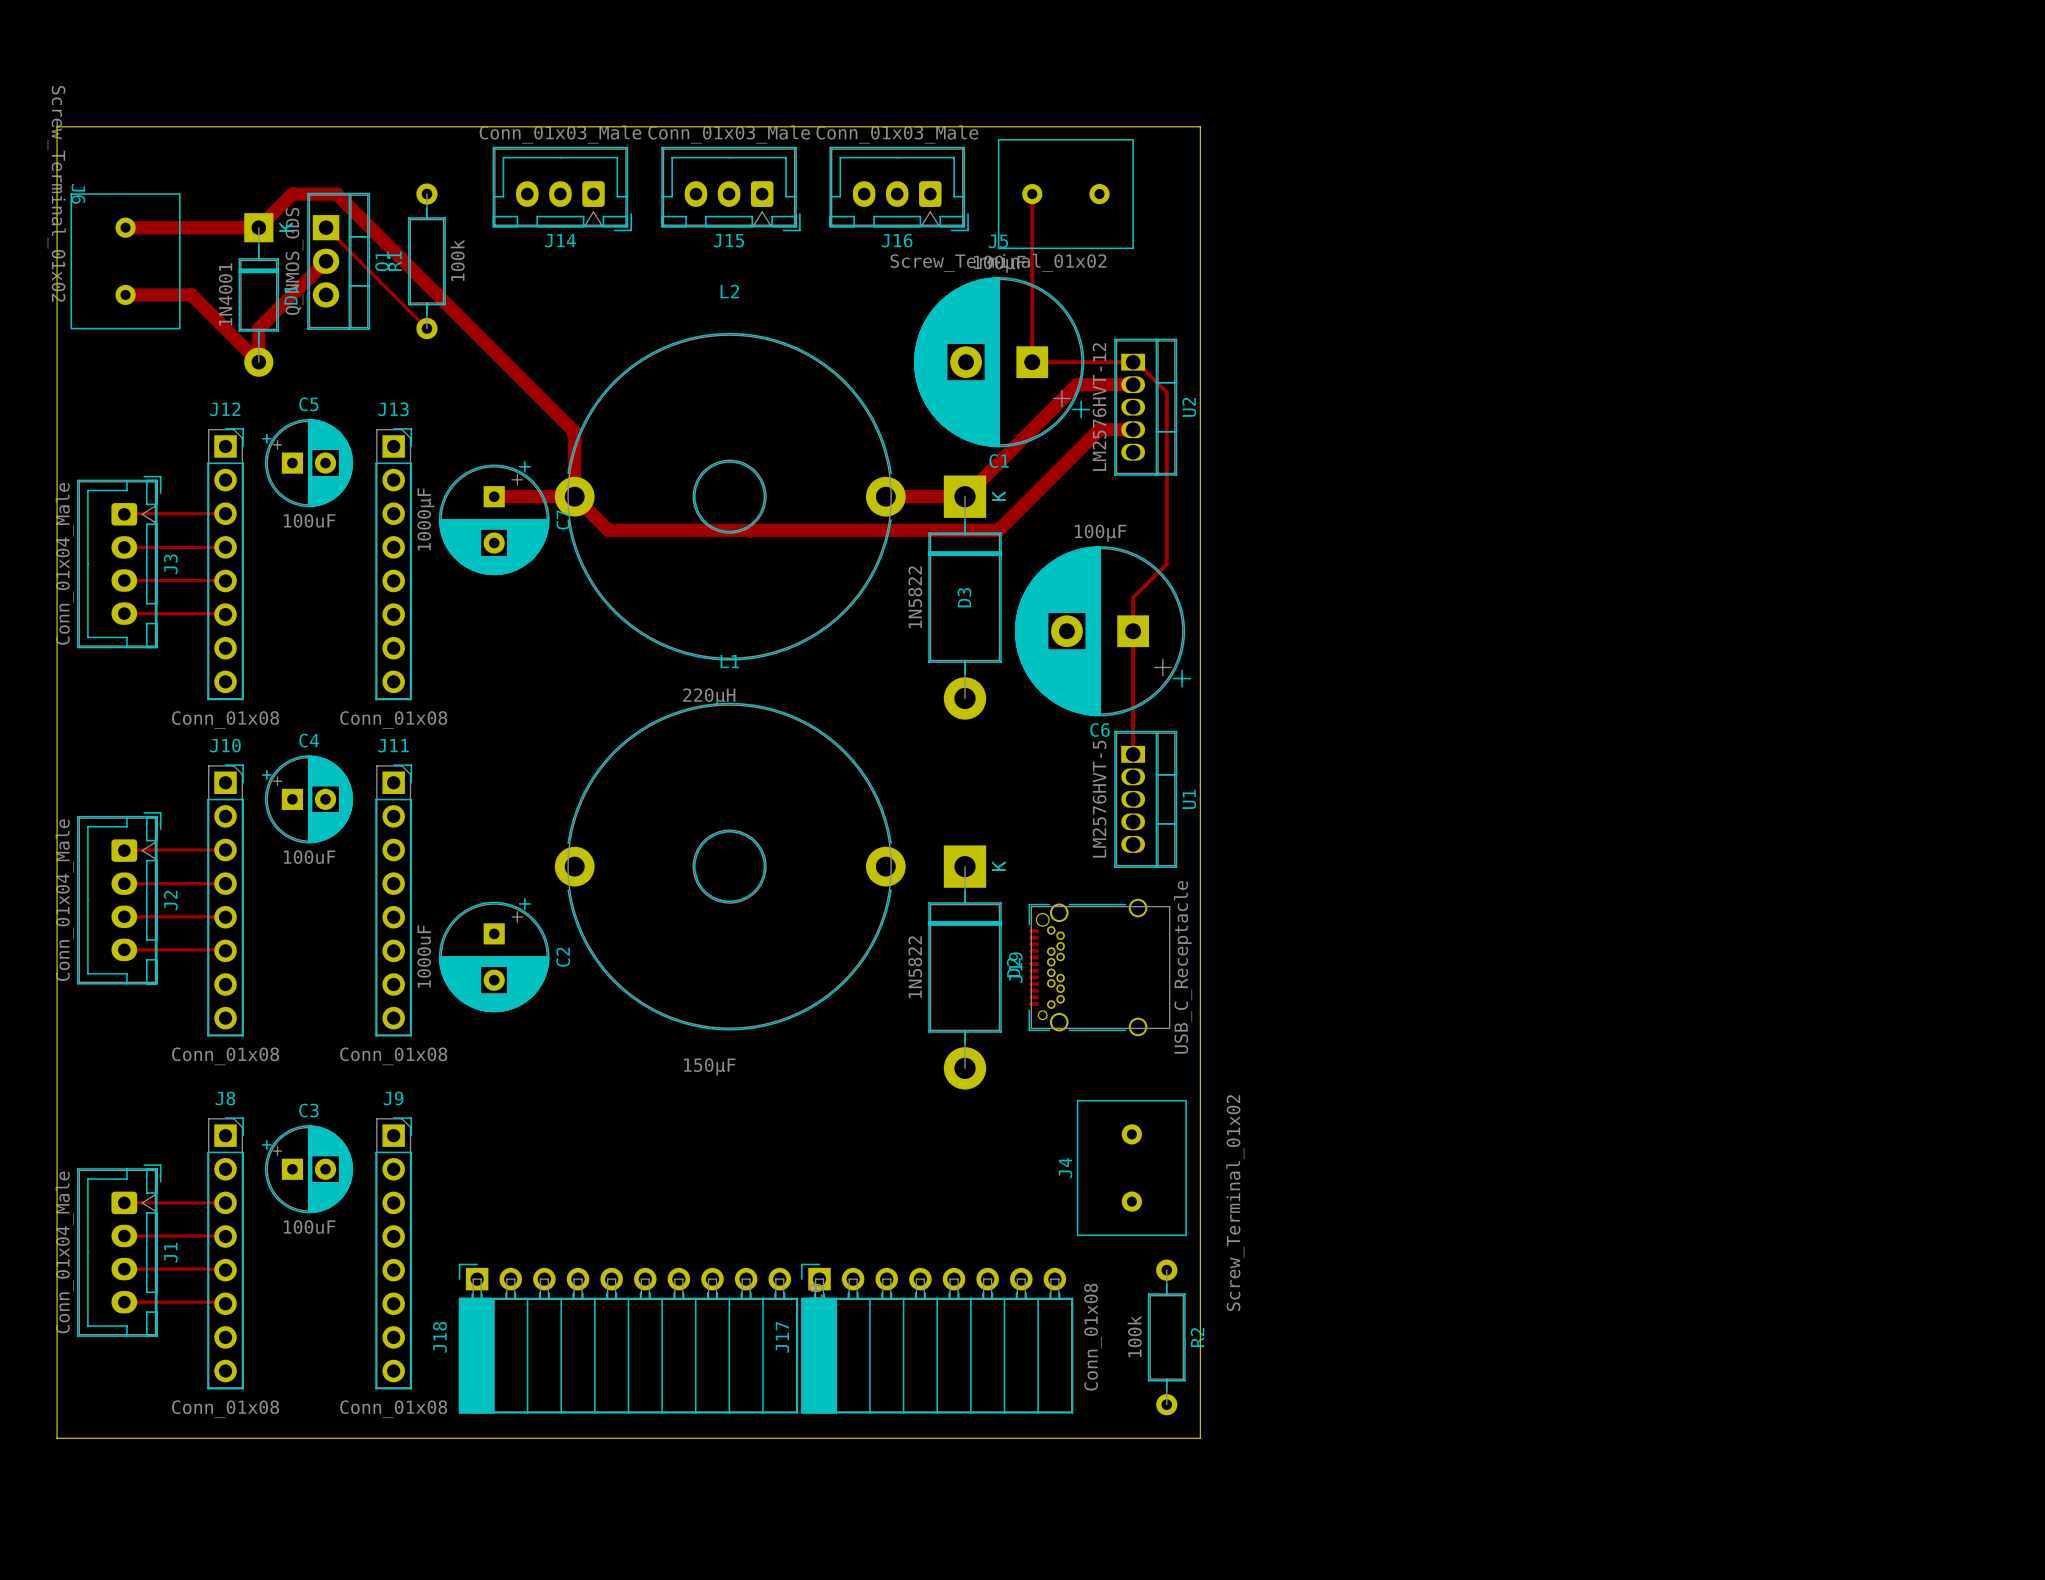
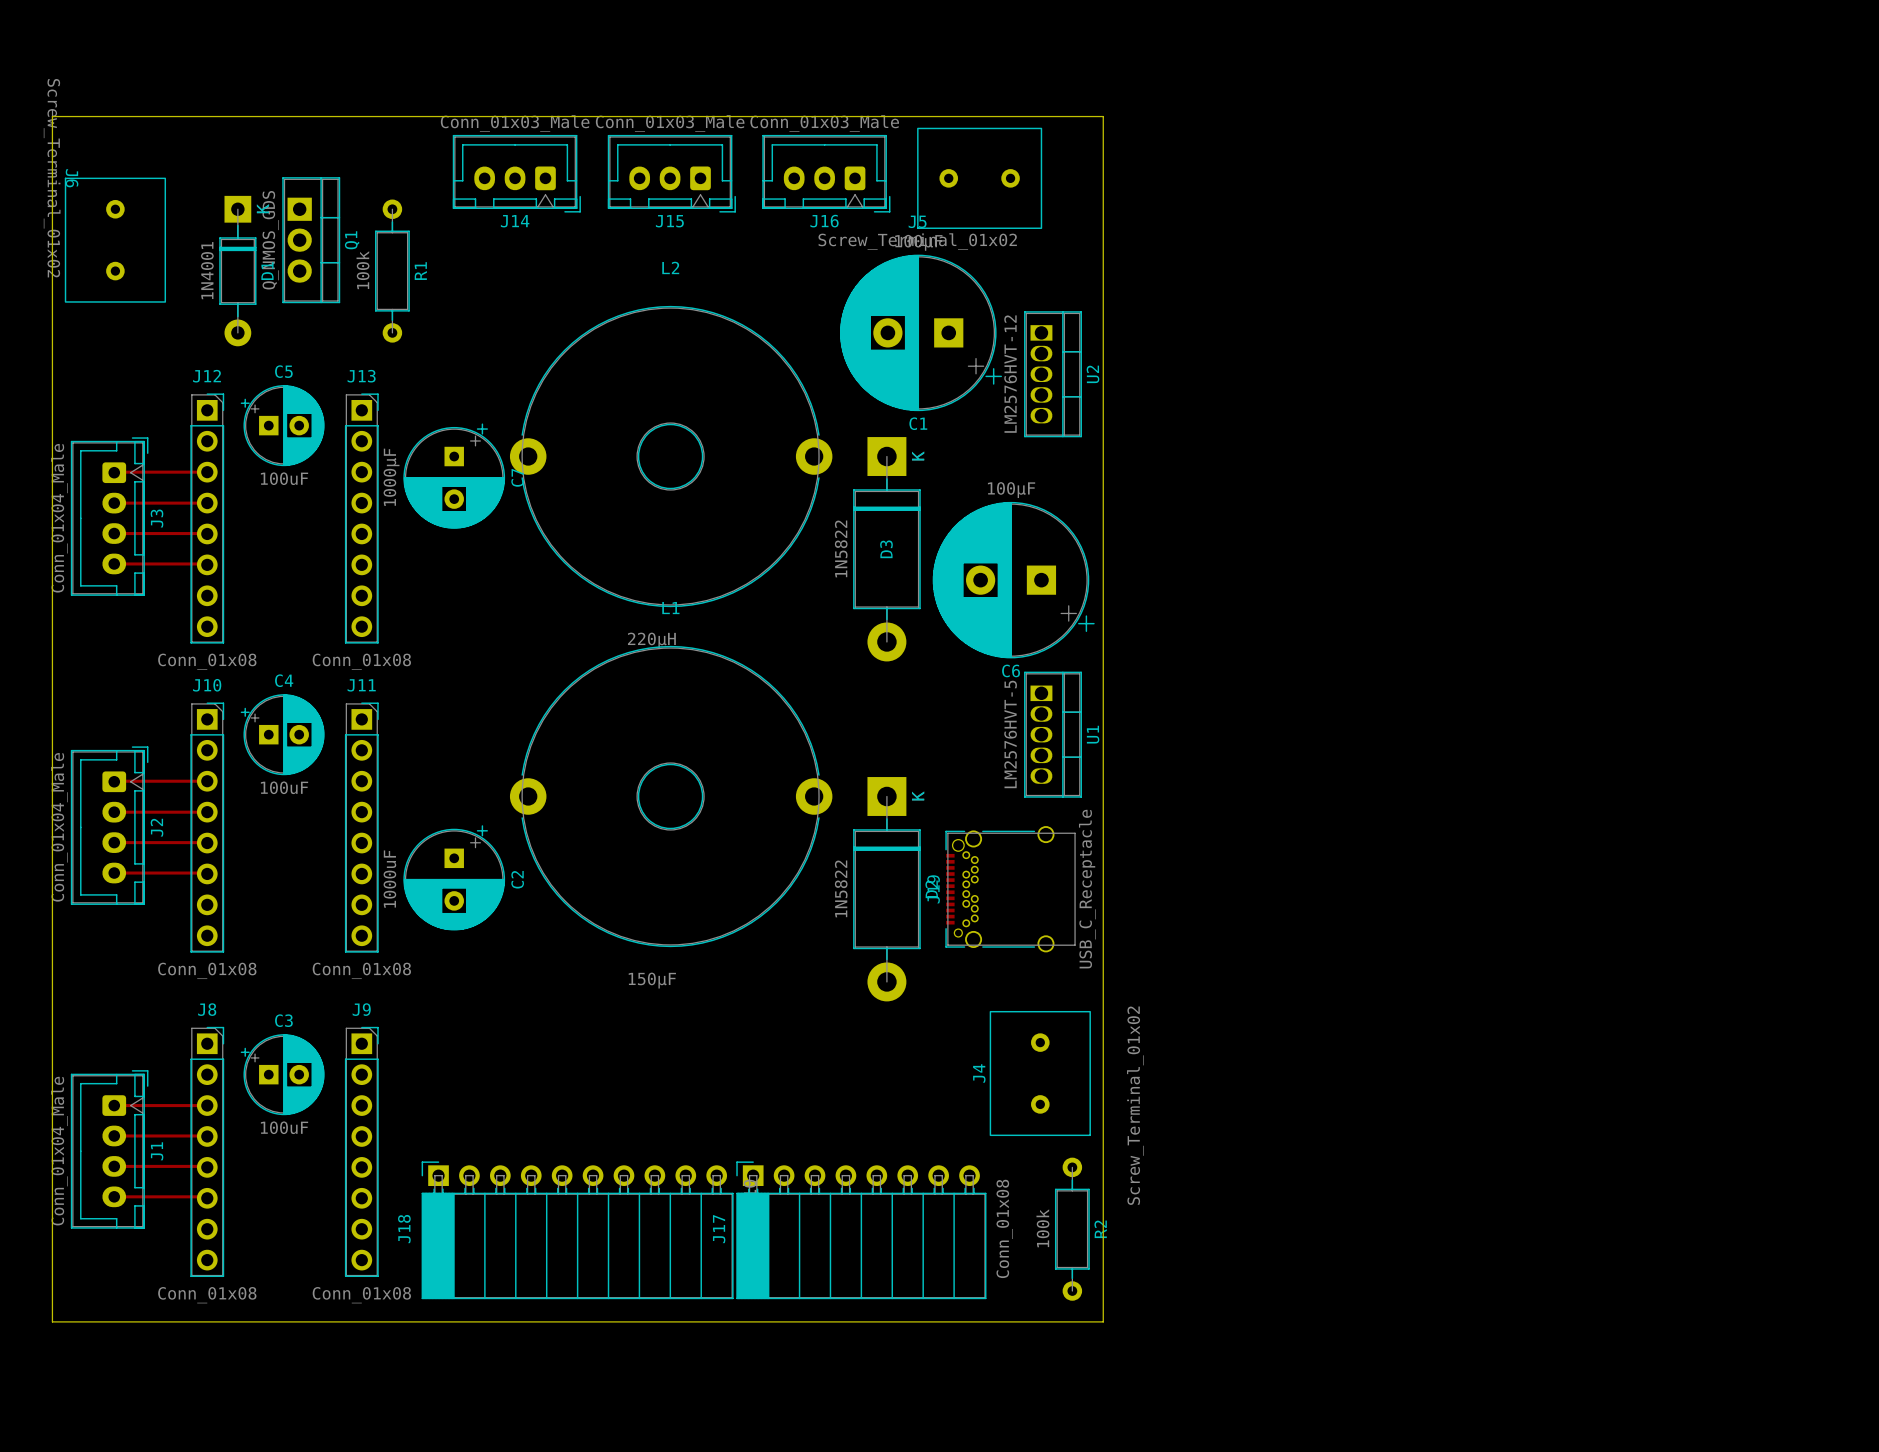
track: (1032, 194) (1032, 362) (1136, 362) (1166, 392) (1166, 563) (1133, 597) (1133, 754) -> none
track: (125, 227) (258, 227) (292, 194) (336, 194) (574, 431) (574, 496) -> none
track: (326, 227) (426, 328) -> none
R1 value position: 100k (457, 260) -> 100k (362, 270)
track: (326, 261) (258, 328) (258, 362) (191, 294) (125, 294) -> none
R1 name position: R1 (395, 261) -> R1 (420, 271)
R1 position: (426, 261) -> (392, 271)
track: (1133, 384) (1077, 384) (965, 496) (885, 496) -> none
track: (1133, 429) (1099, 429) (998, 530) (608, 530) (574, 496) -> none
track: (494, 496) (574, 496) -> none

